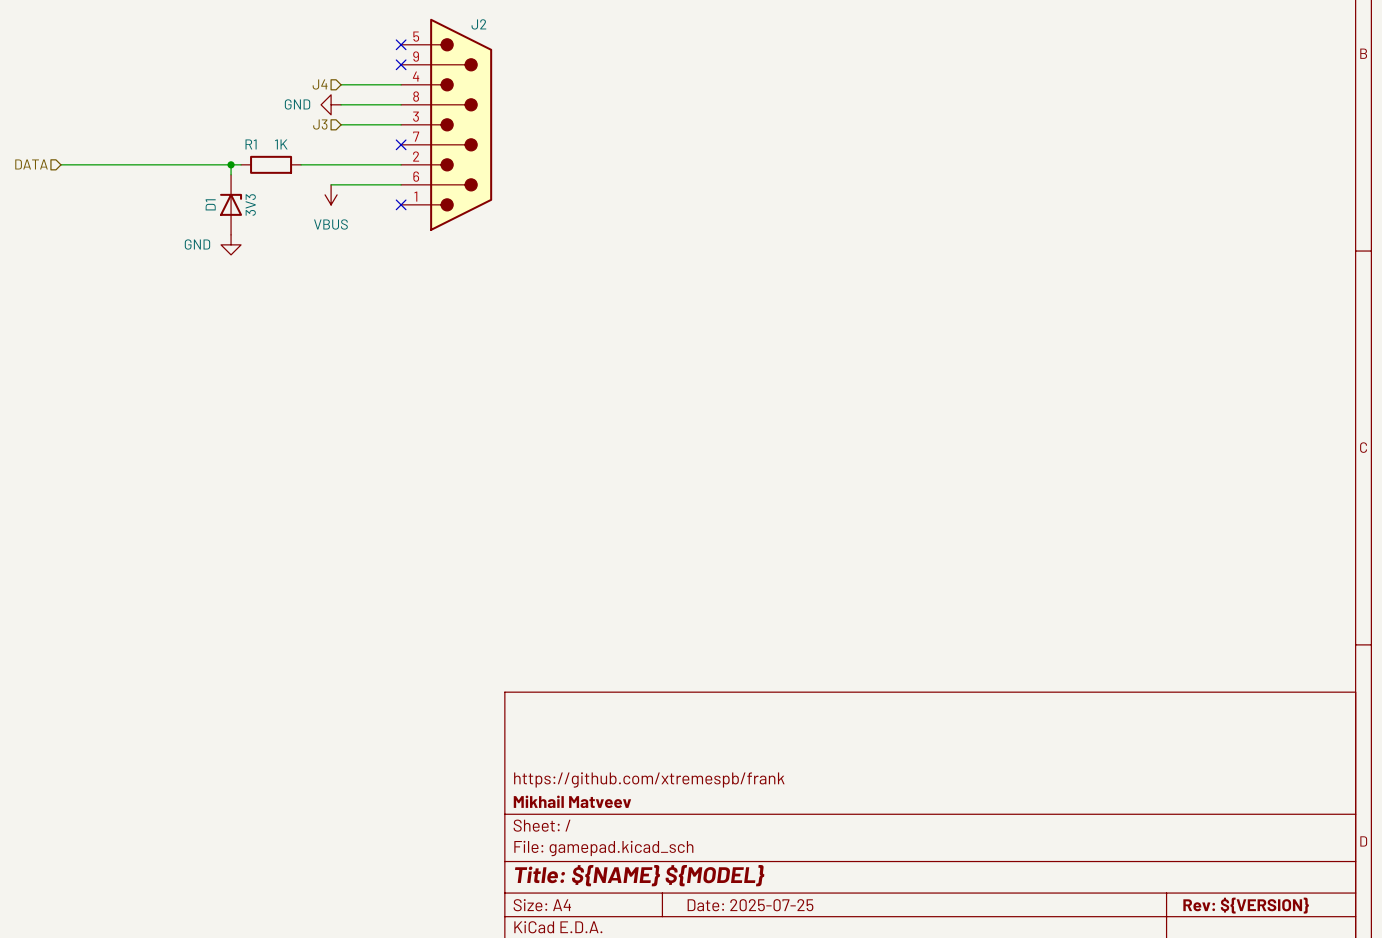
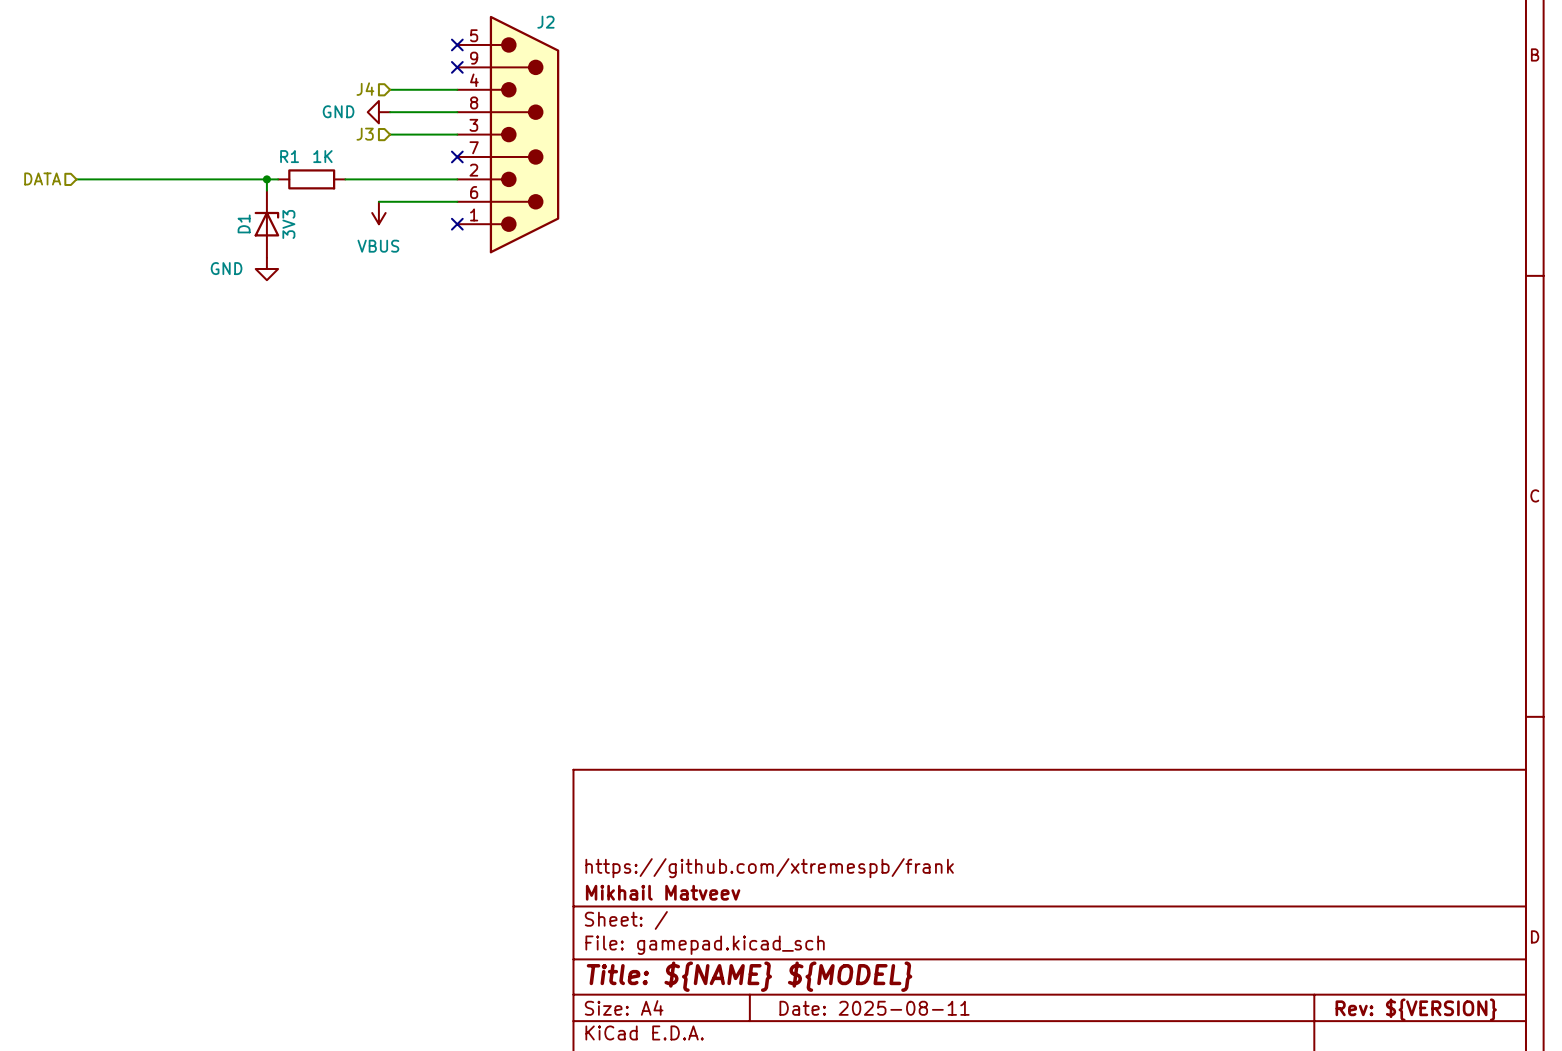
title block: Date: 2025-07-25 (750, 905) -> Date: 2025-08-11 (874, 1008)

